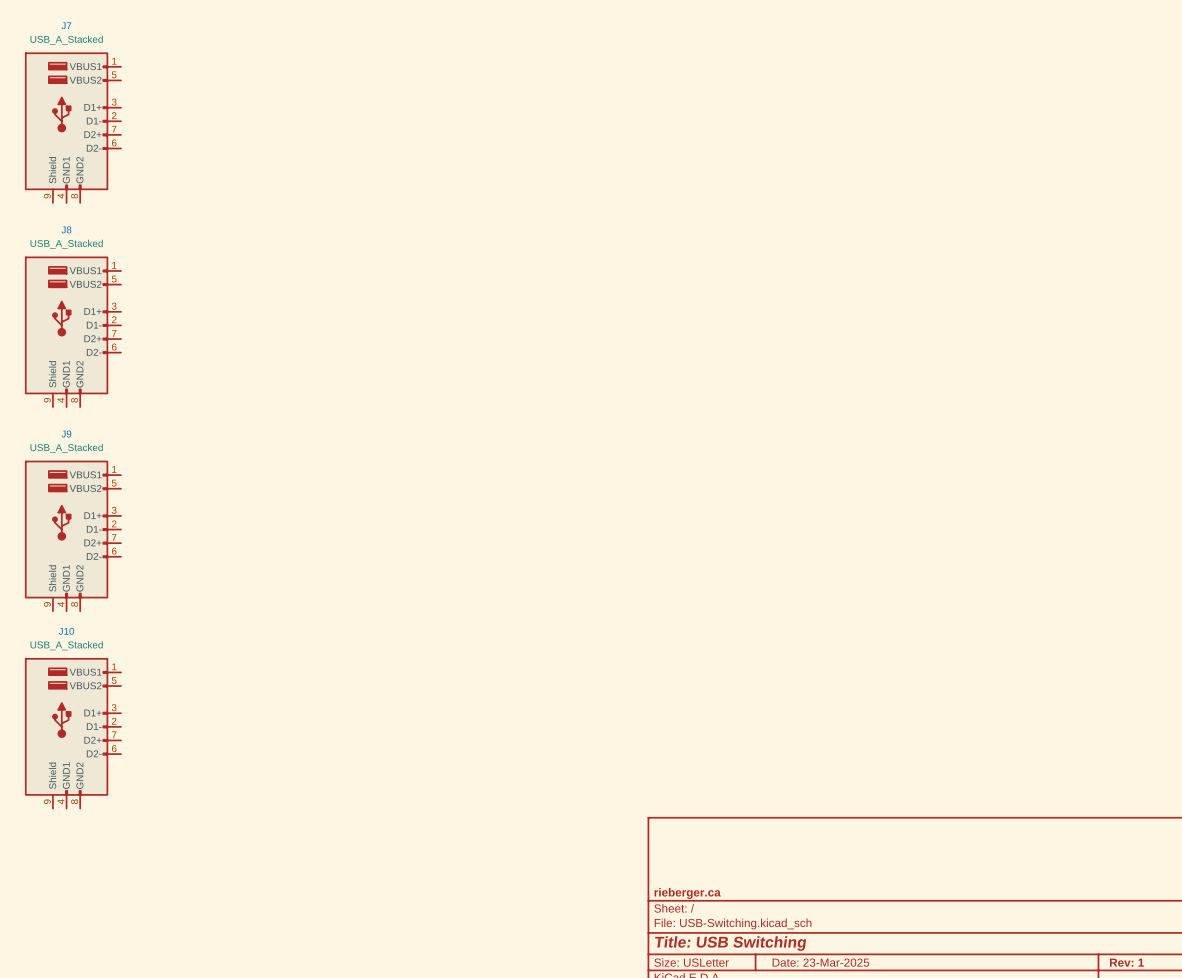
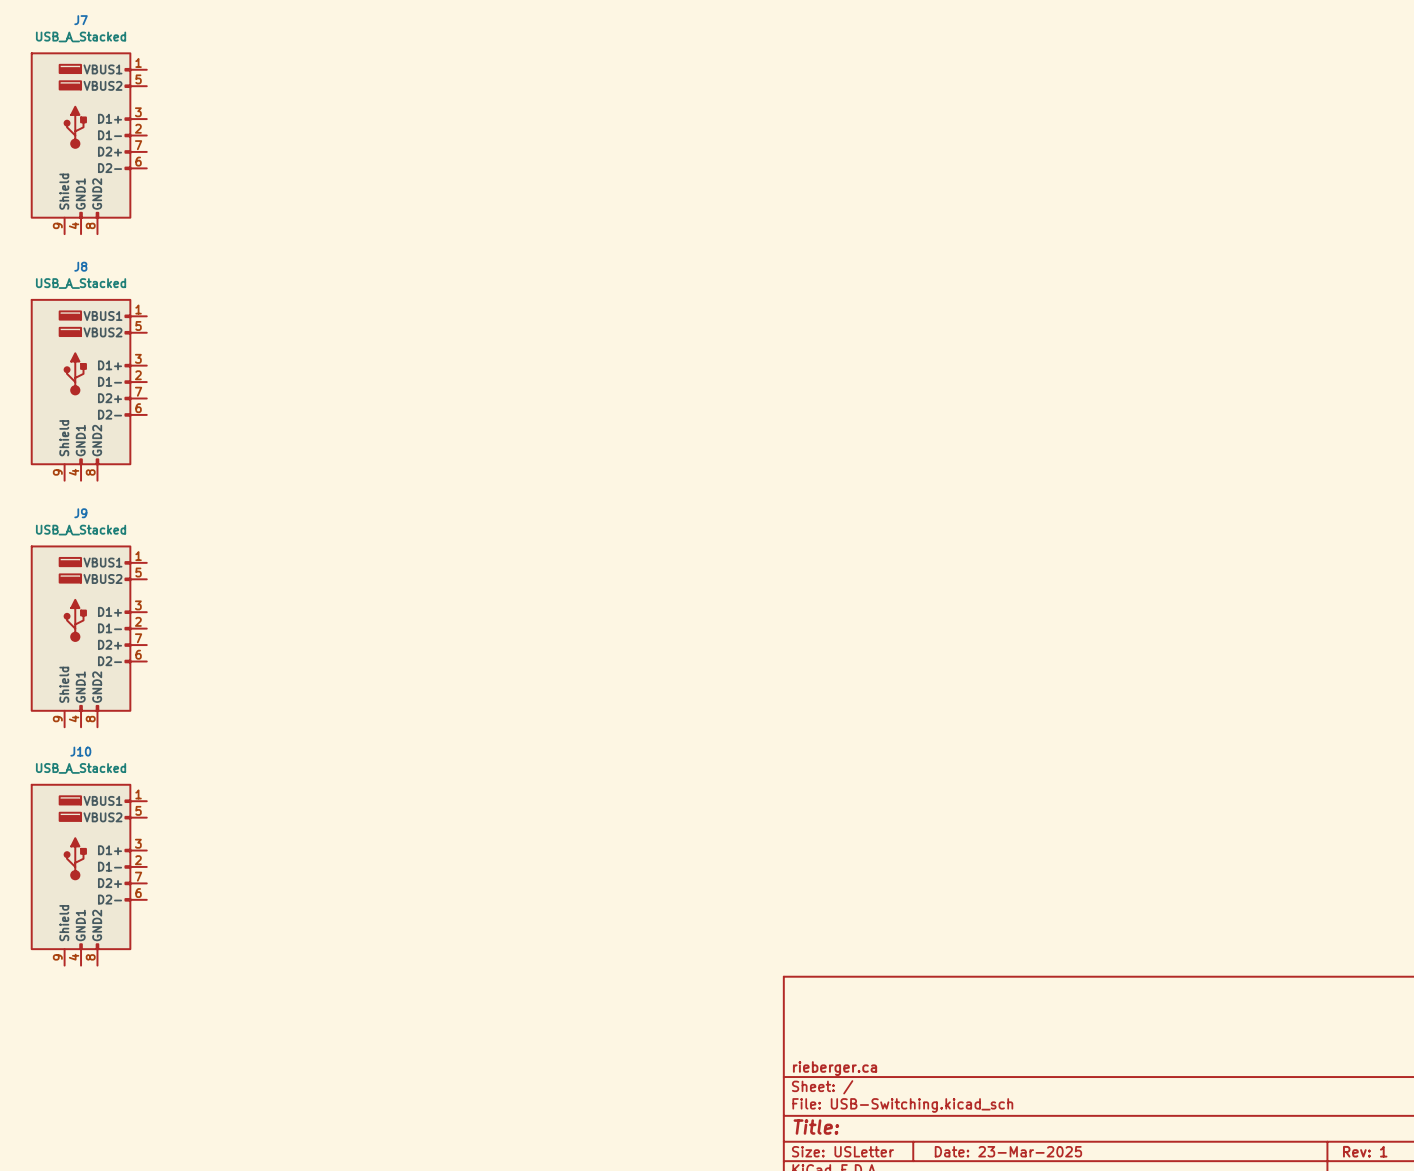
title block: Title: USB Switching (730, 943) -> Title: (816, 1127)

